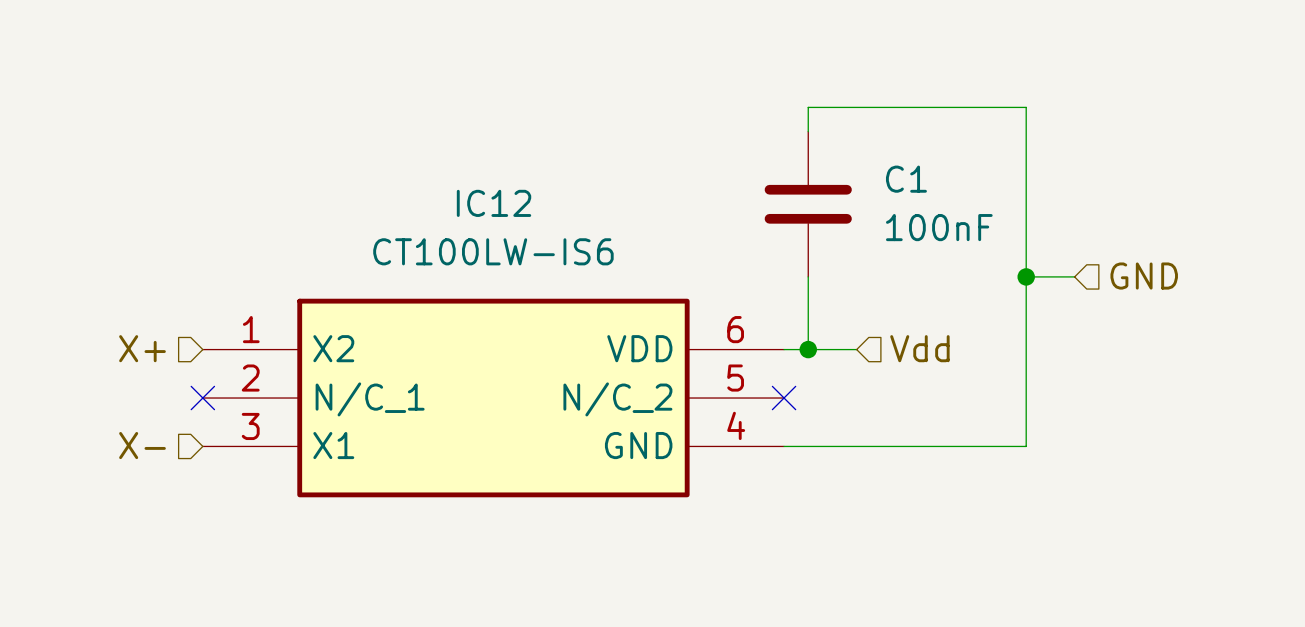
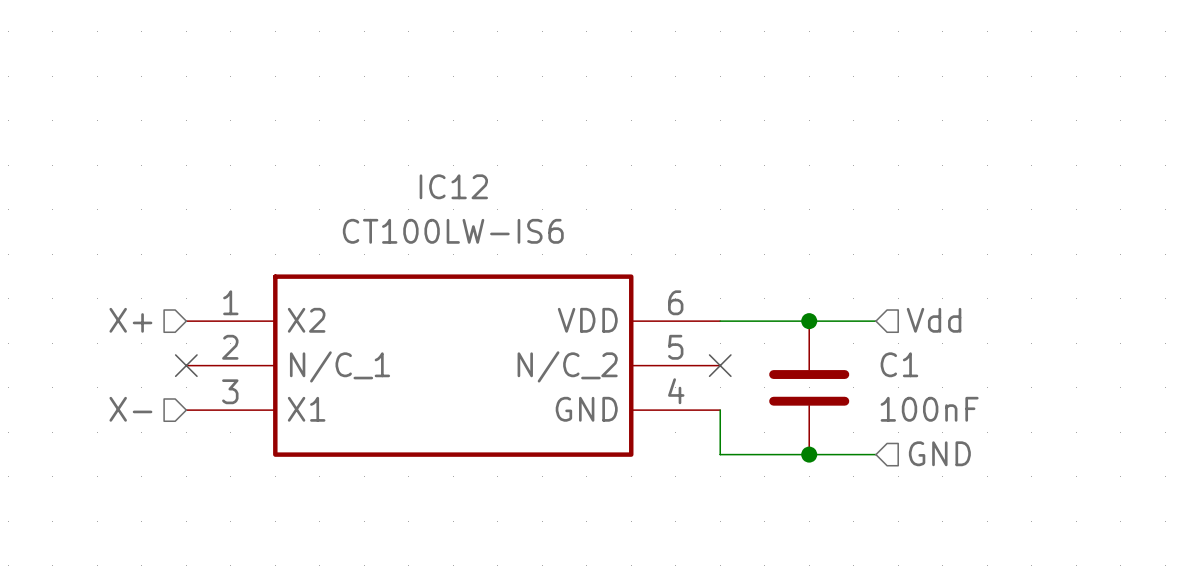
wire: (808, 131) (808, 107) (1026, 107) (1026, 446) (784, 446) -> (875, 454) (720, 454) (720, 410)
C1 position: (808, 204) -> (809, 387)
wire: (808, 276) (808, 349) -> none
wire: (1026, 276) (1074, 276) -> none
junction: (1026, 276) -> none
hierarchical label position: GND (1144, 276) -> GND (939, 453)
hierarchical label position: Vdd (919, 348) -> Vdd (934, 320)
junction position: (808, 349) -> (809, 321)
wire: none -> (786, 321) (875, 321)
junction: none -> (809, 454)

